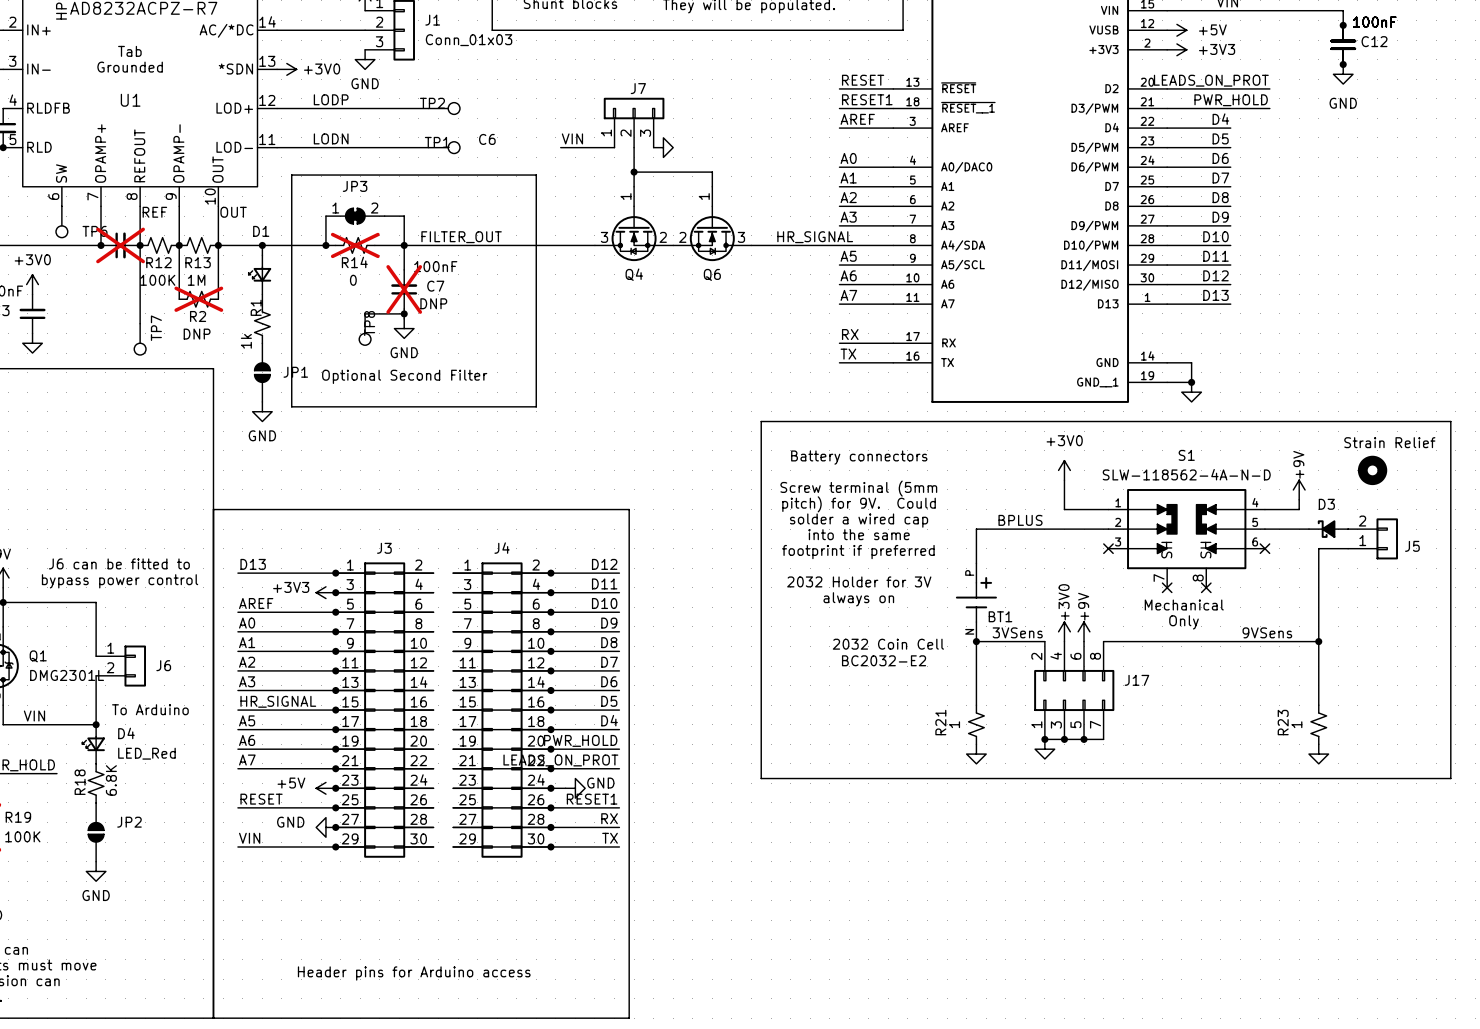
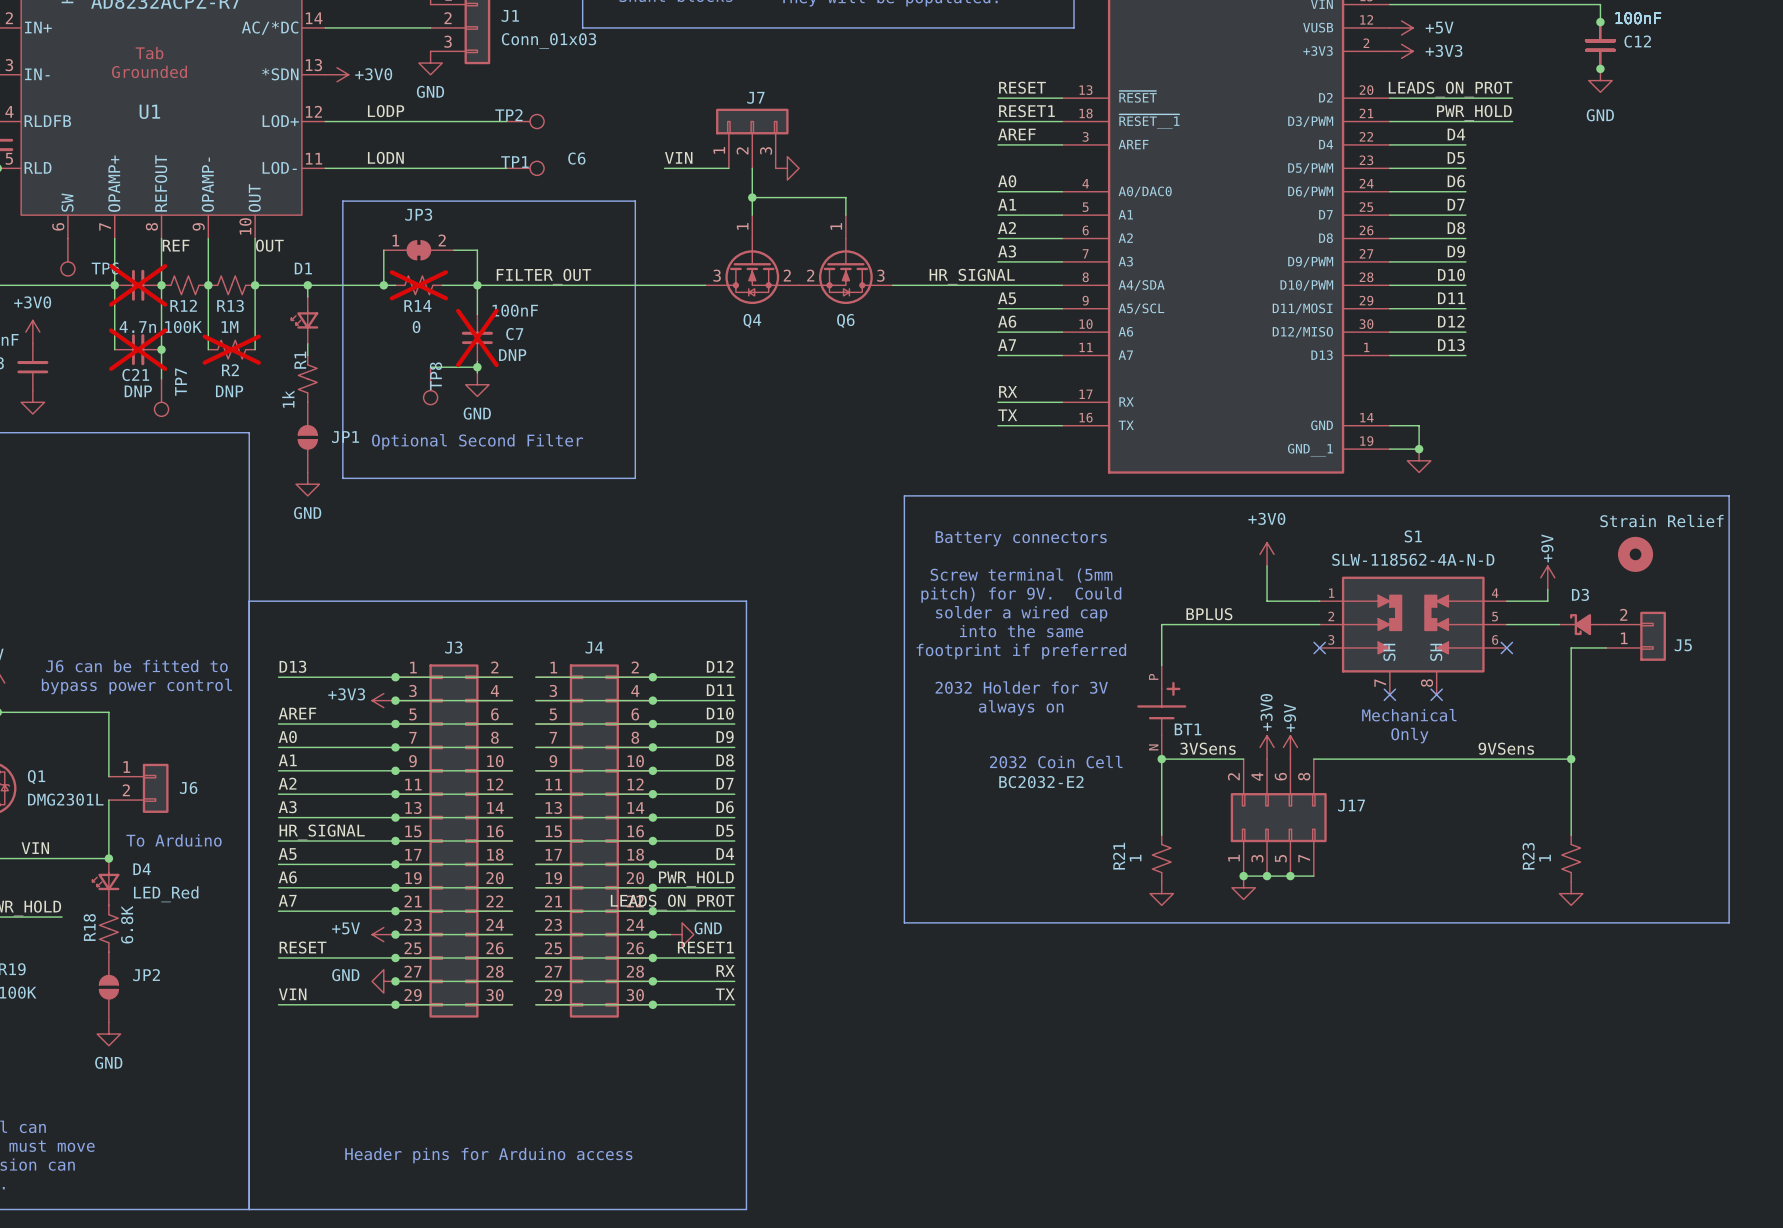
wire: none -> (114, 285) (114, 349)
C6 value: none -> 4.7n (137, 327)
C21: none -> DNP (138, 349)
junction: none -> (161, 349)

